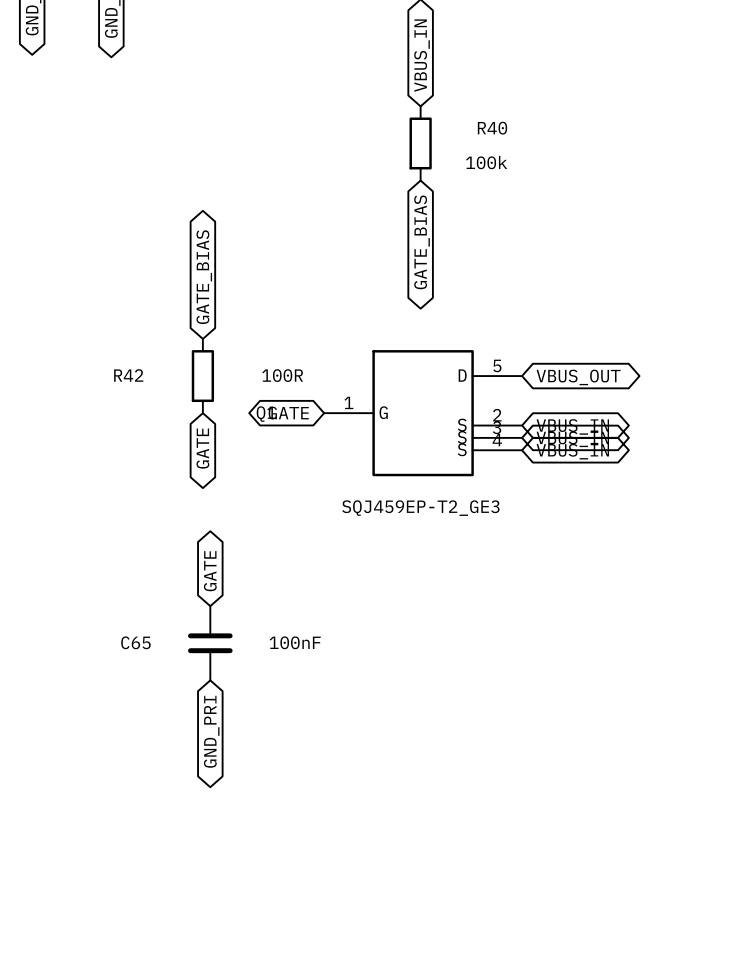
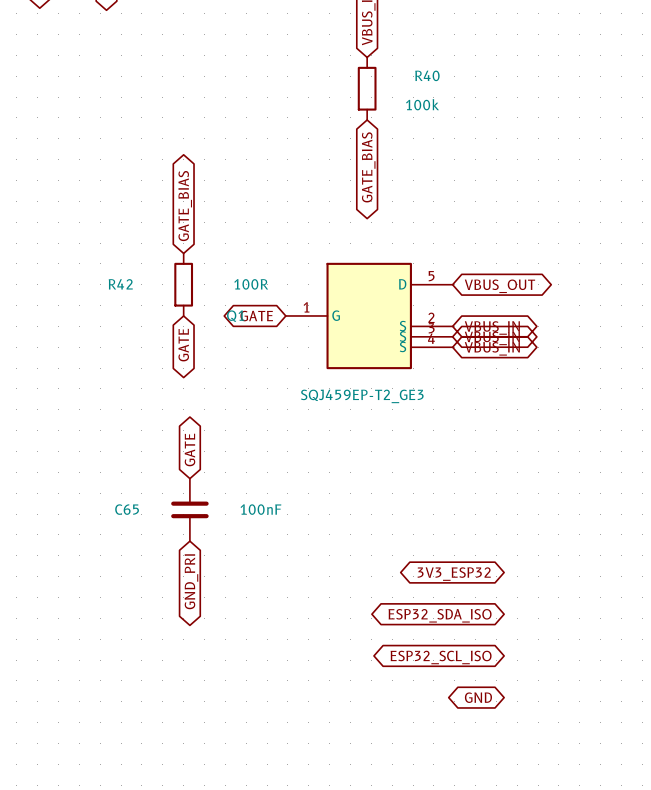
global label: none -> 3V3_ESP32 (454, 574)
global label: none -> ESP32_SDA_ISO (440, 615)
global label: none -> ESP32_SCL_ISO (441, 657)
global label: none -> GND (478, 697)

